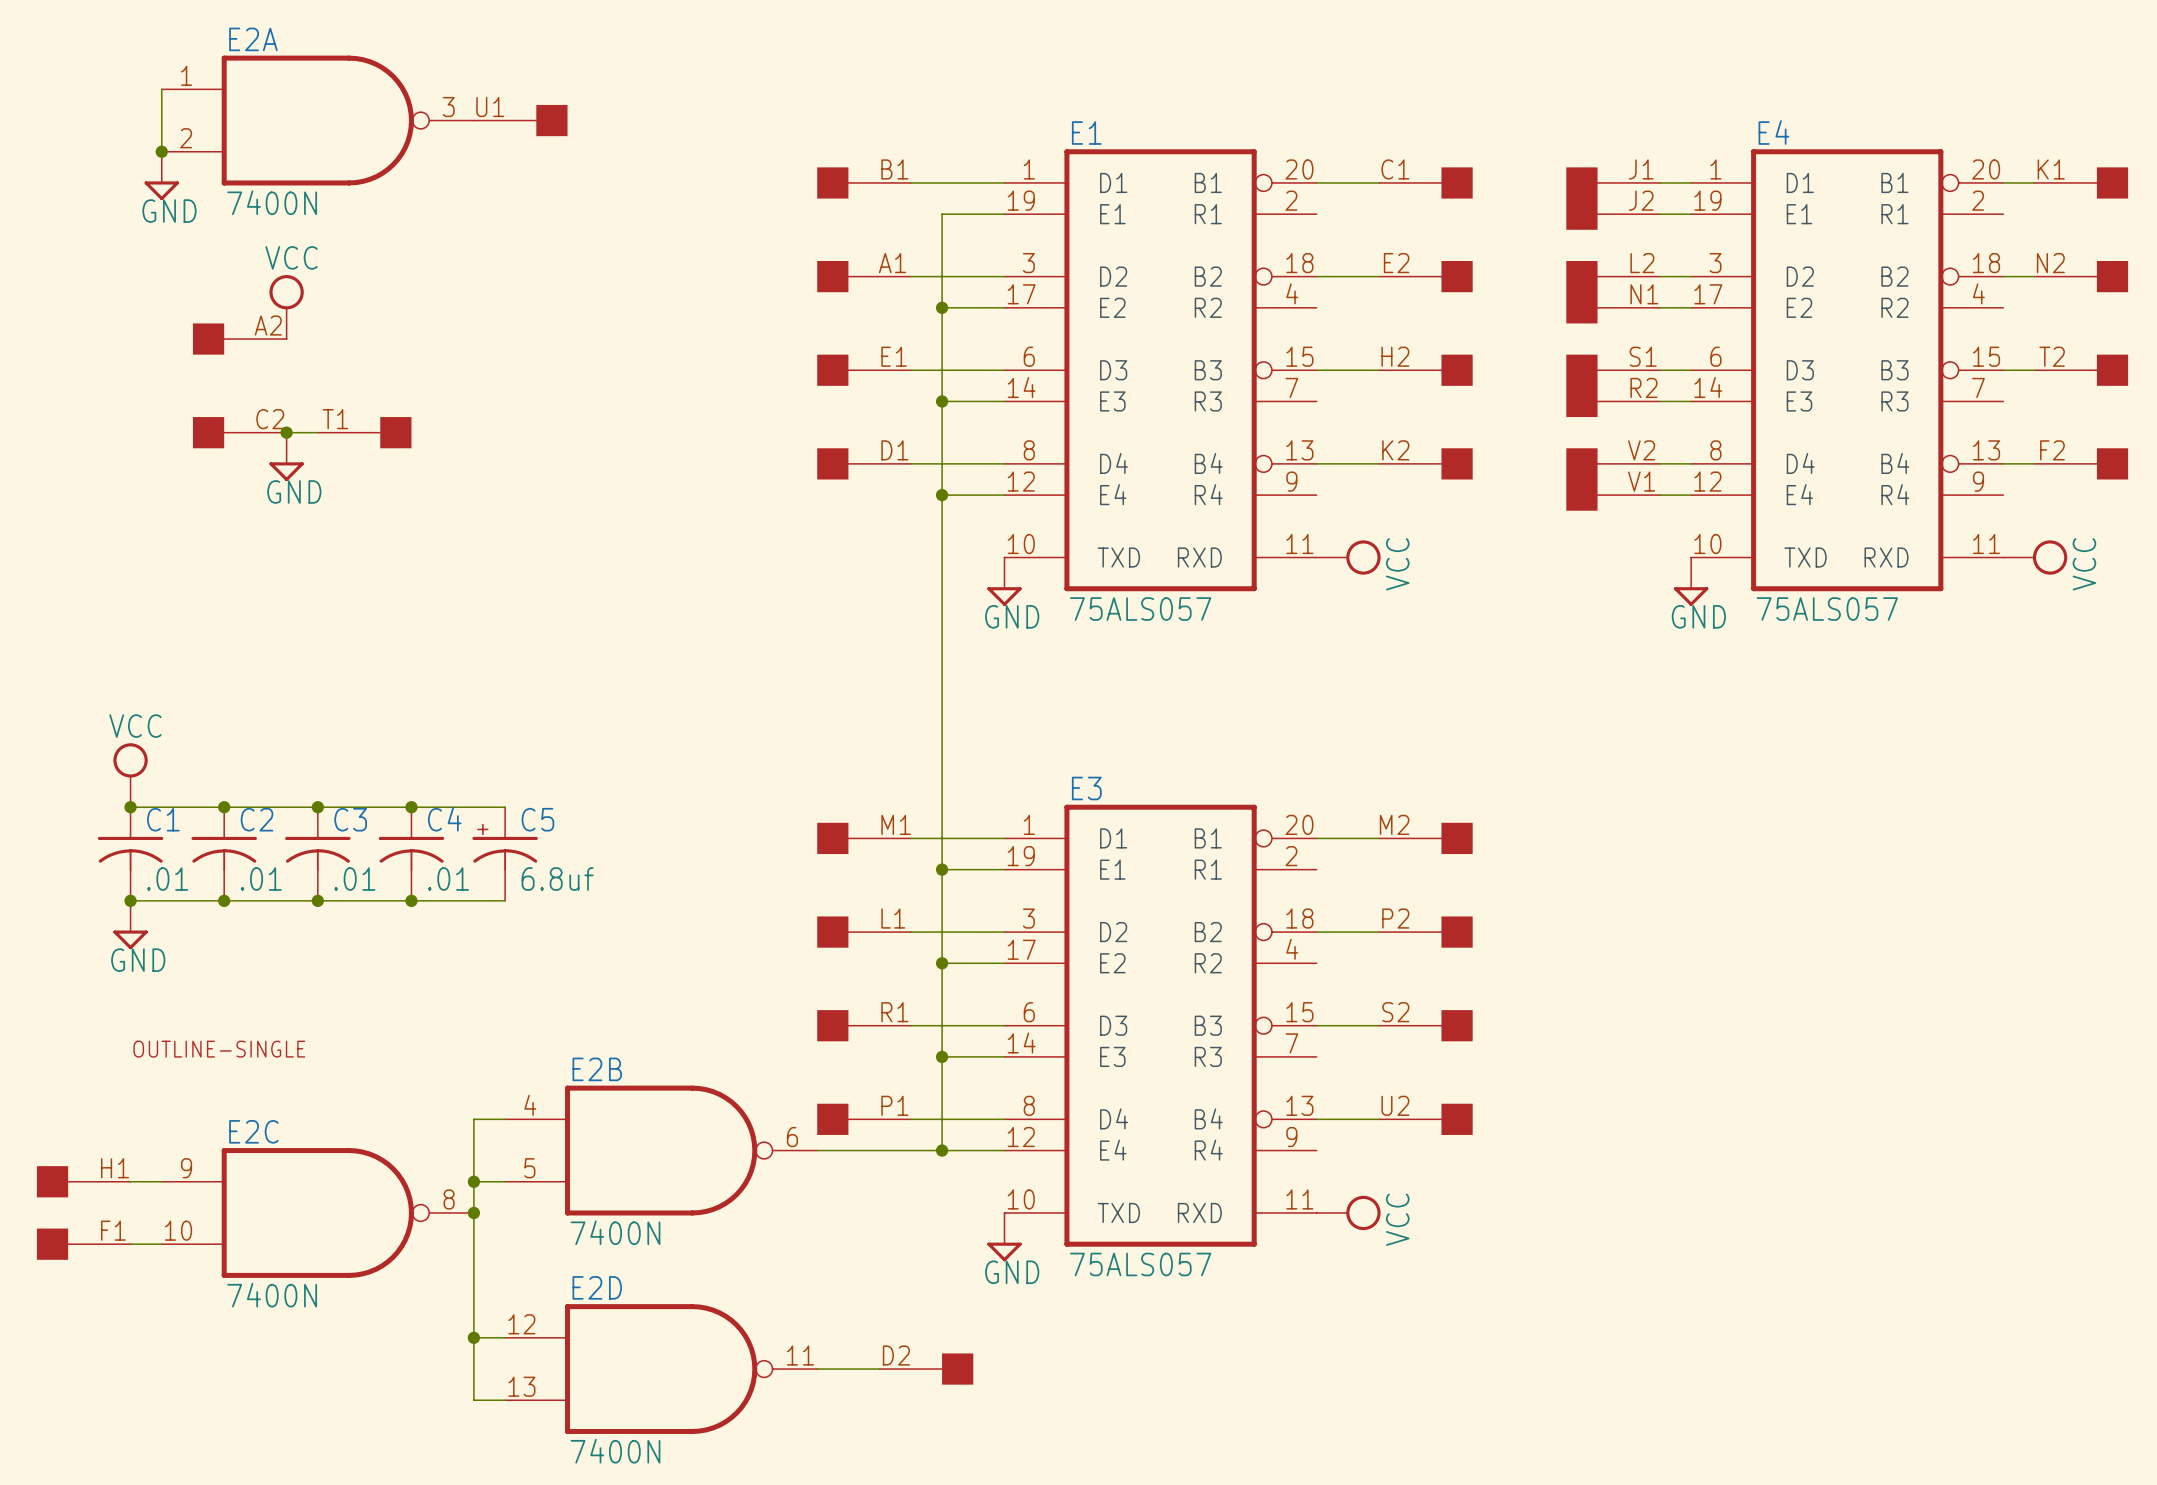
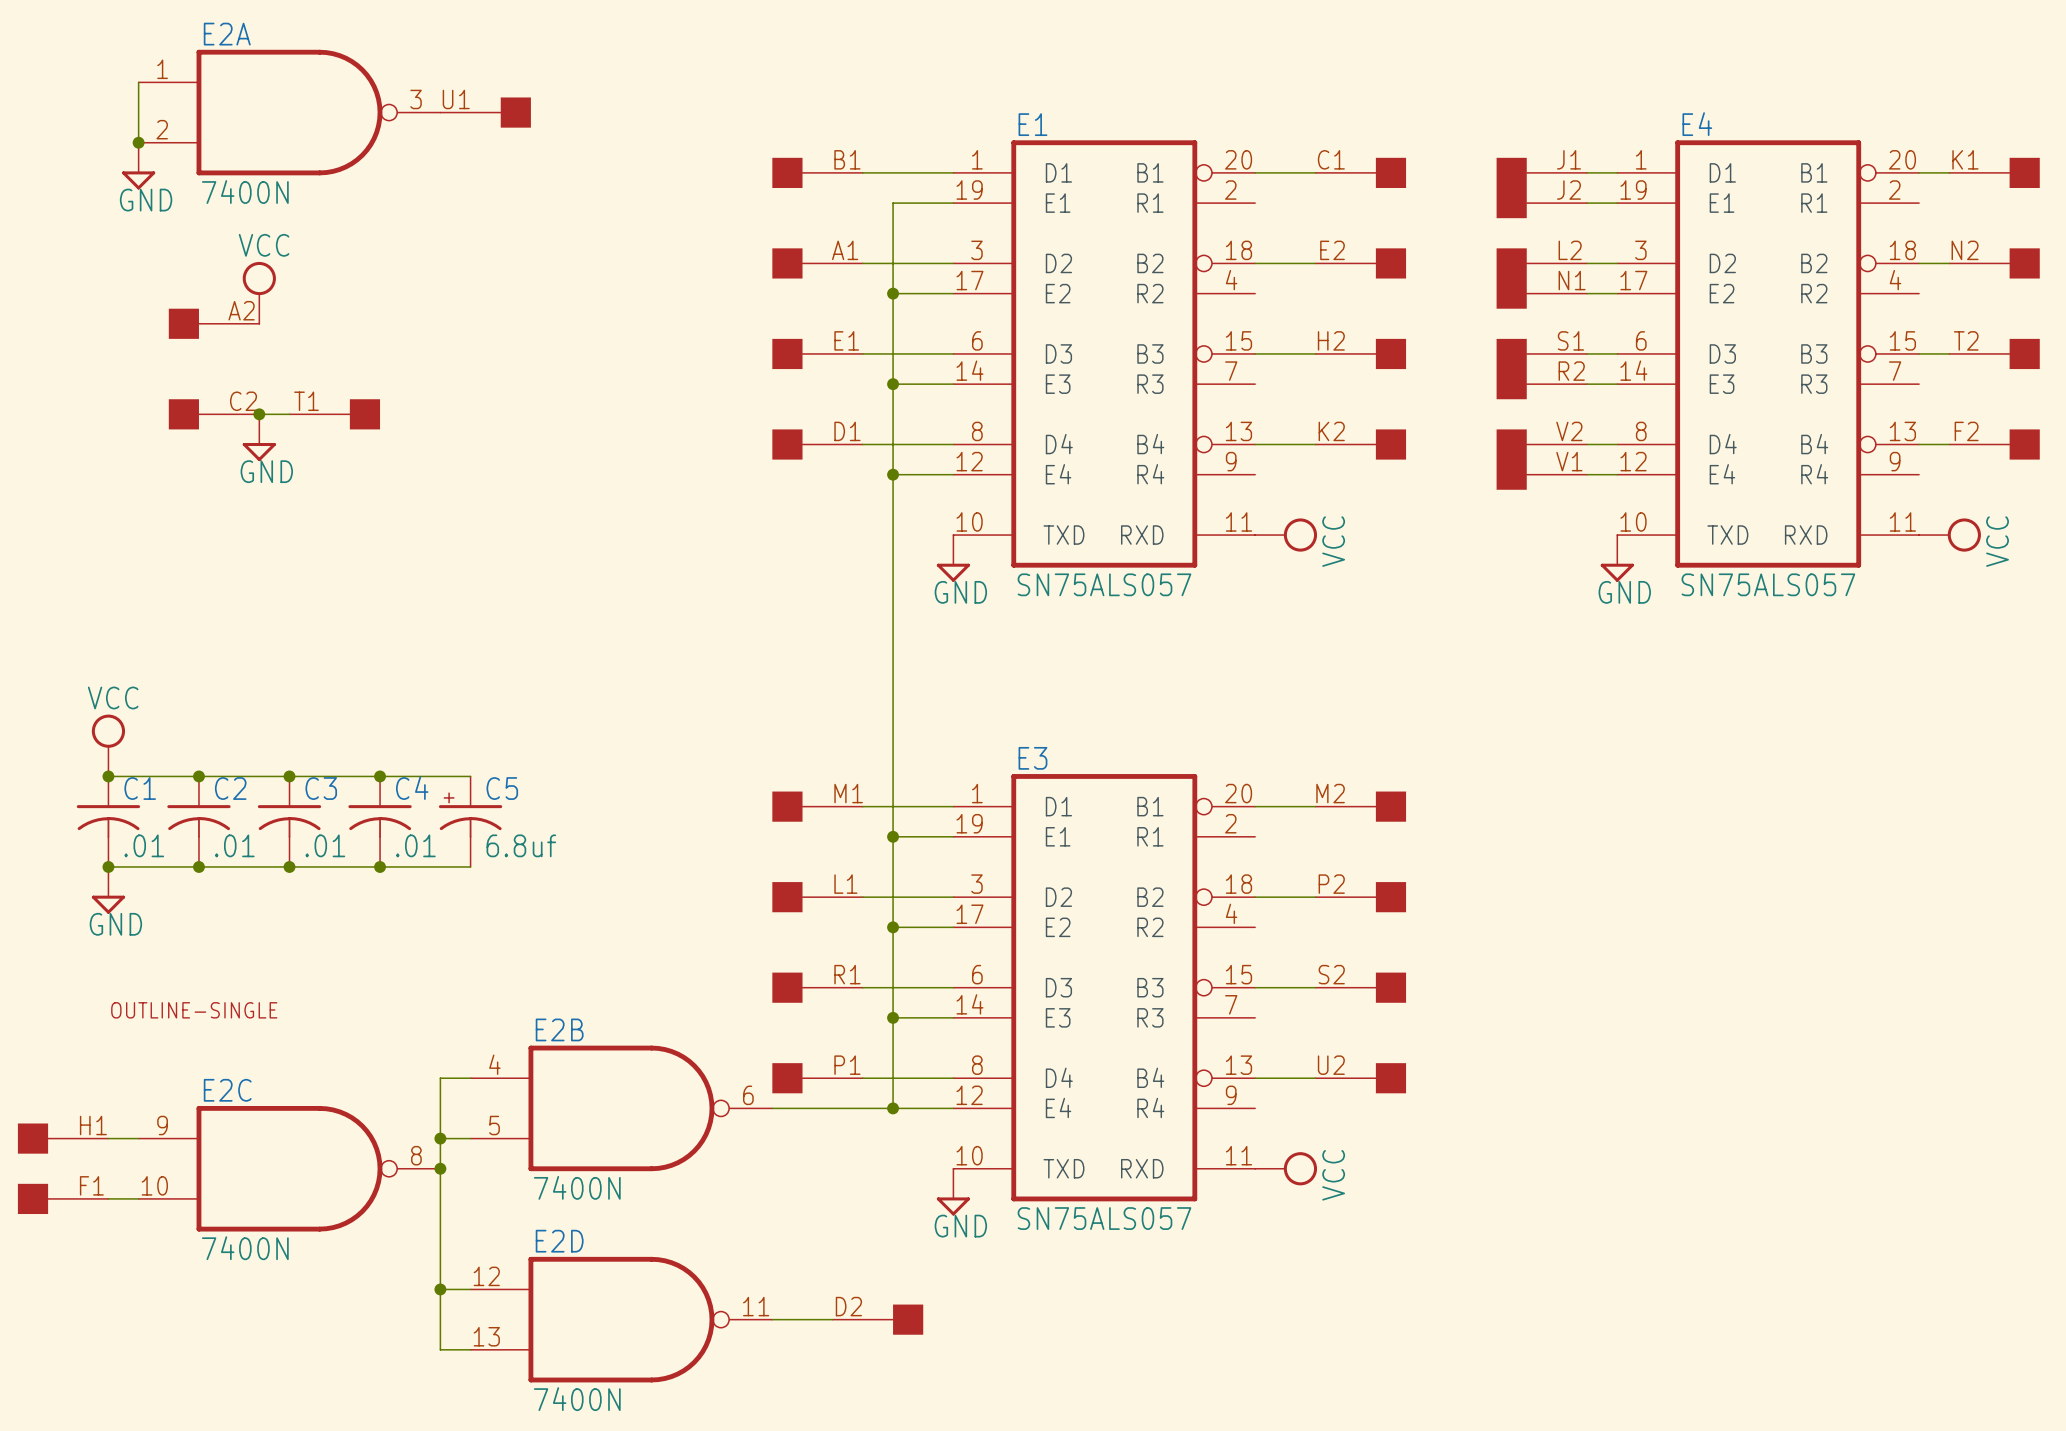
E1 value: 75ALS057 (1140, 609) -> SN75ALS057 (1104, 584)
E4 value: 75ALS057 (1827, 609) -> SN75ALS057 (1768, 584)
E3 value: 75ALS057 (1140, 1264) -> SN75ALS057 (1104, 1218)

